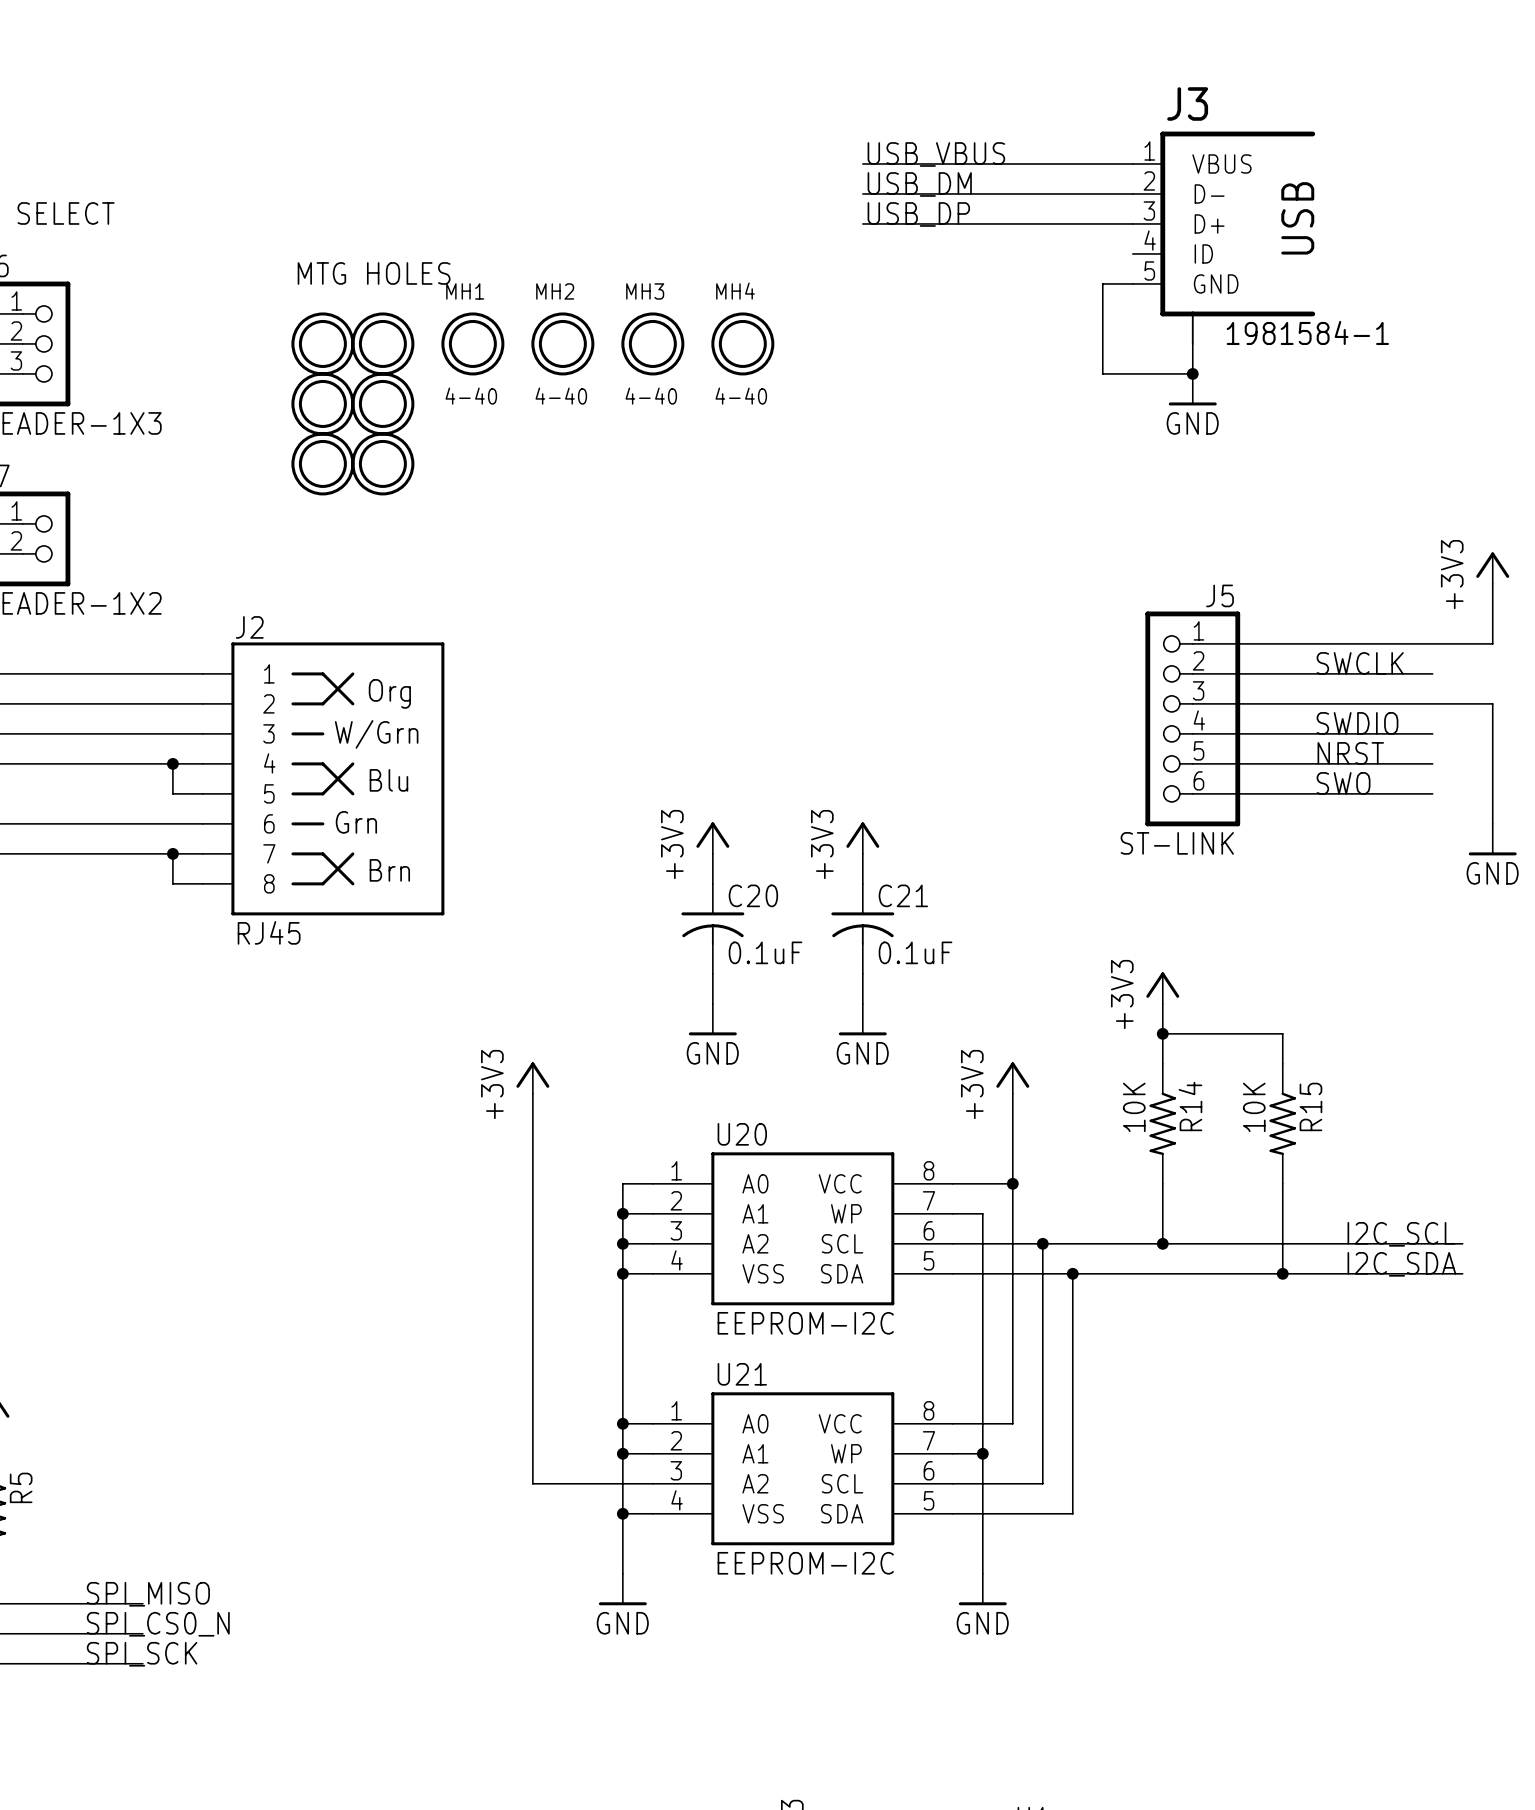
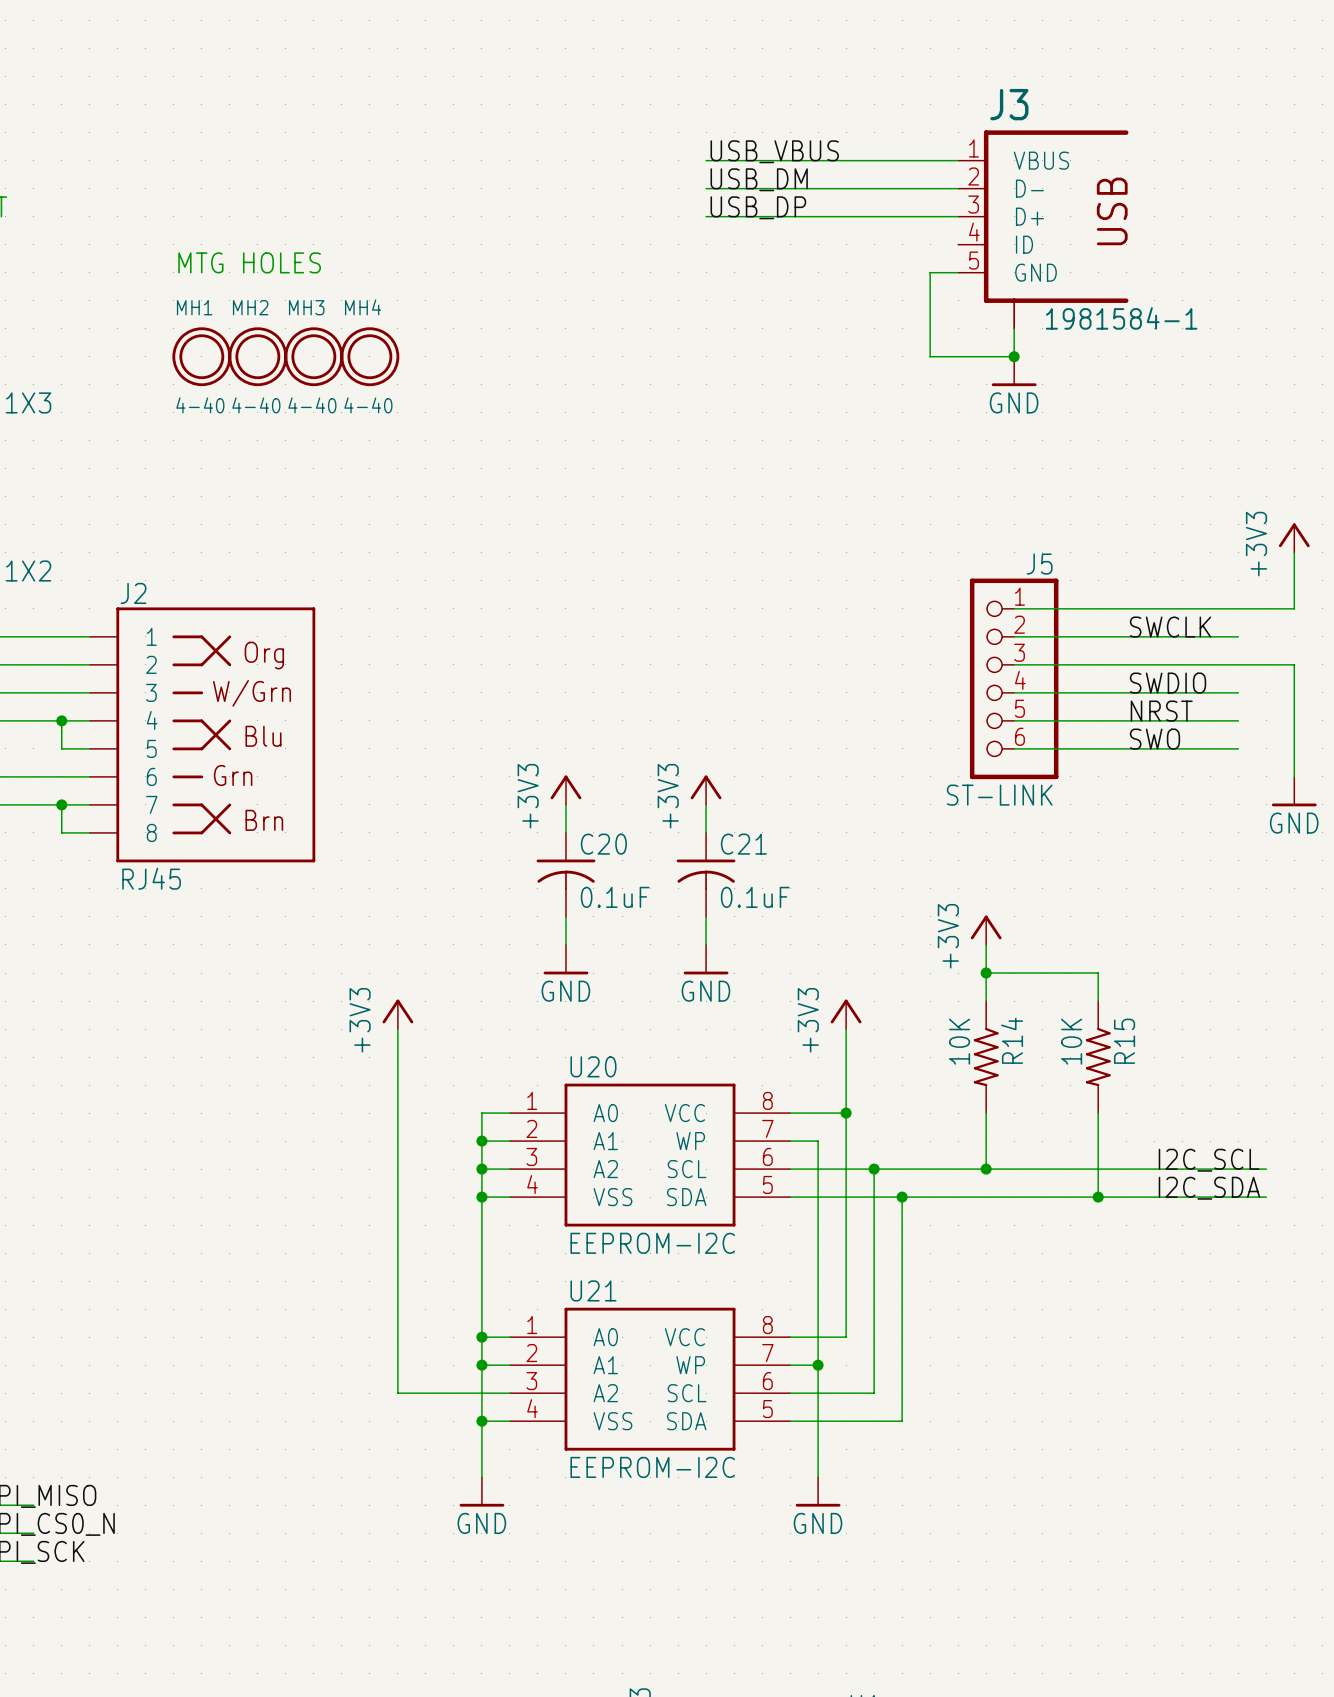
part: (322, 343) -> none
part: (382, 343) -> none
MH1 position: (472, 343) -> (201, 356)
MH2 position: (562, 343) -> (257, 356)
MH3 position: (652, 343) -> (313, 356)
MH4 position: (742, 343) -> (369, 356)
part: (322, 403) -> none
part: (382, 403) -> none
part: (322, 463) -> none
part: (382, 463) -> none

